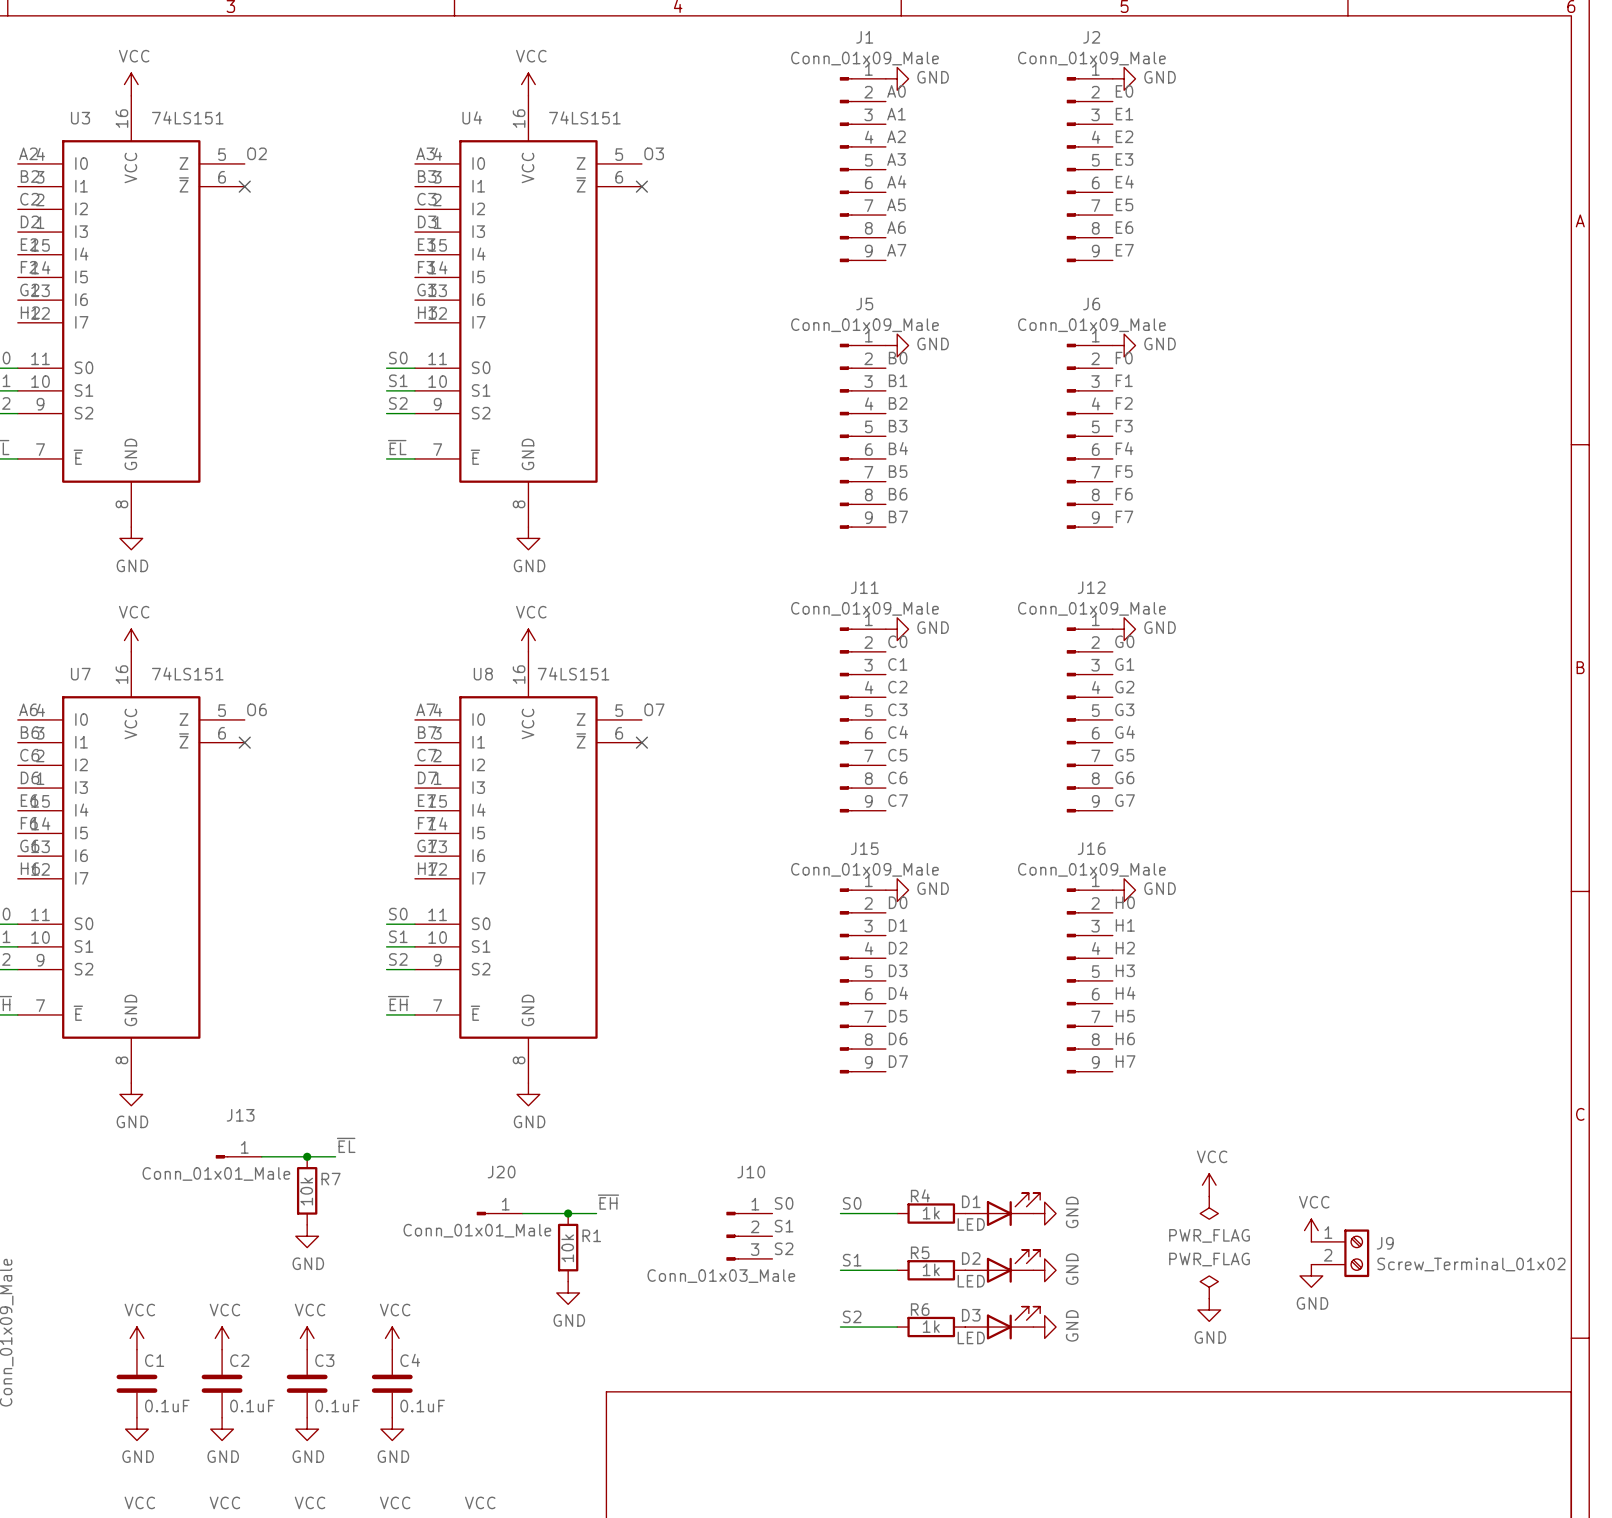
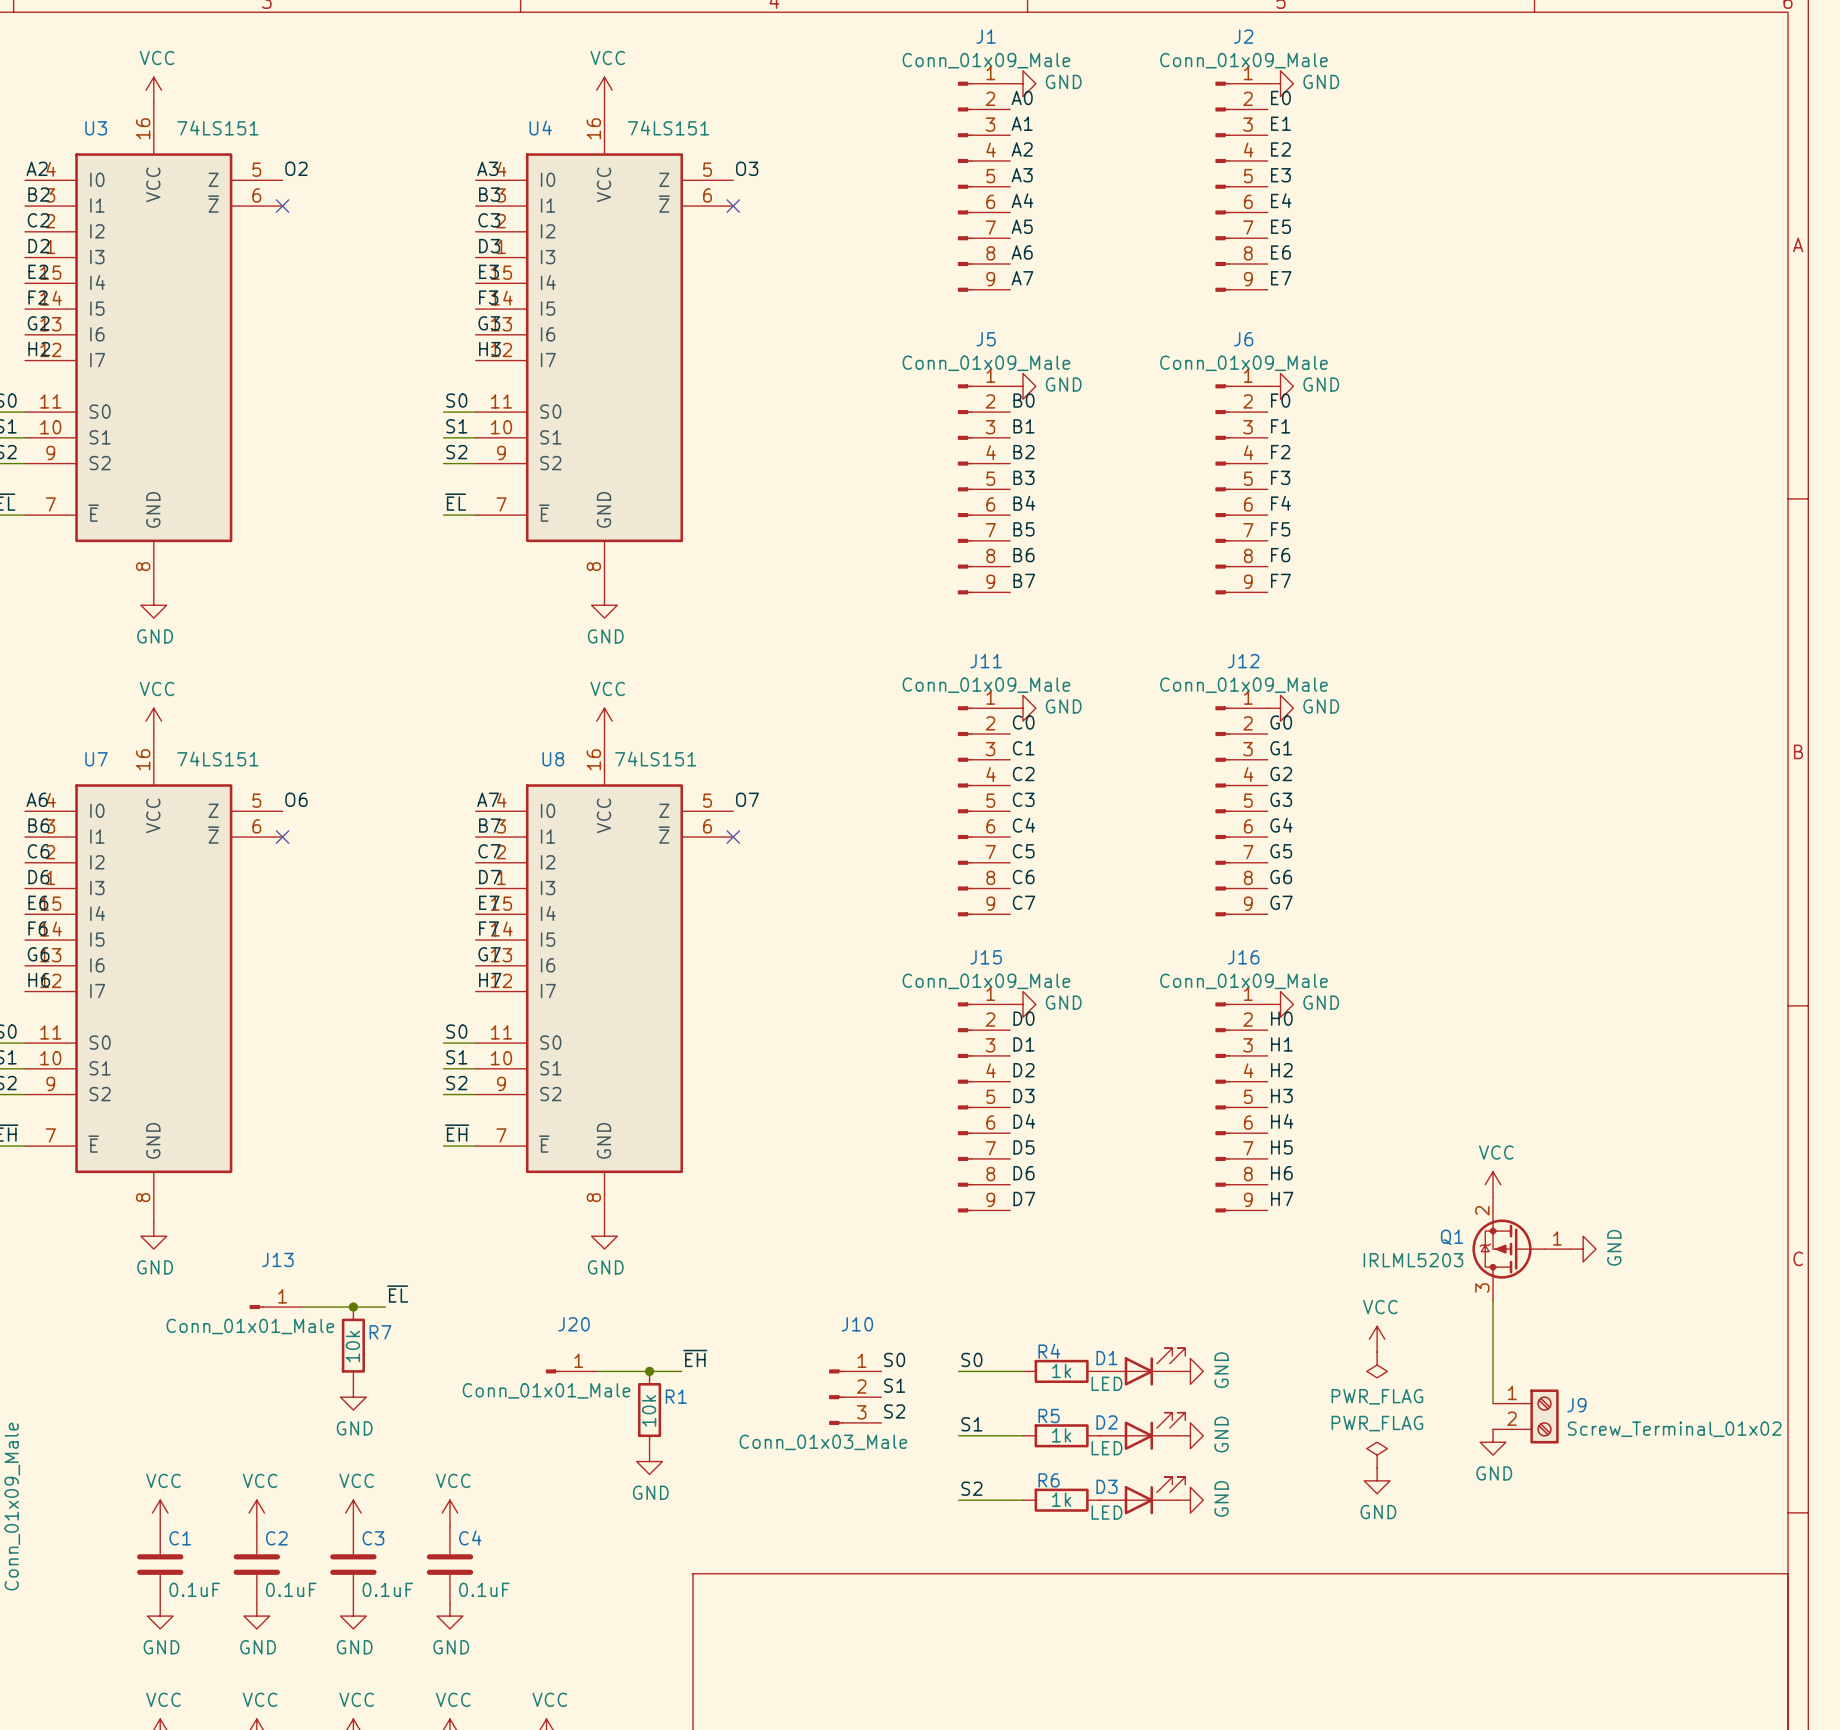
Q1: none -> IRLML5203 (1521, 1249)
power symbol: none -> GND (1583, 1249)
wire: none -> (1493, 1300) (1493, 1403)
power symbol position: VCC (1311, 1230) -> VCC (1493, 1184)

